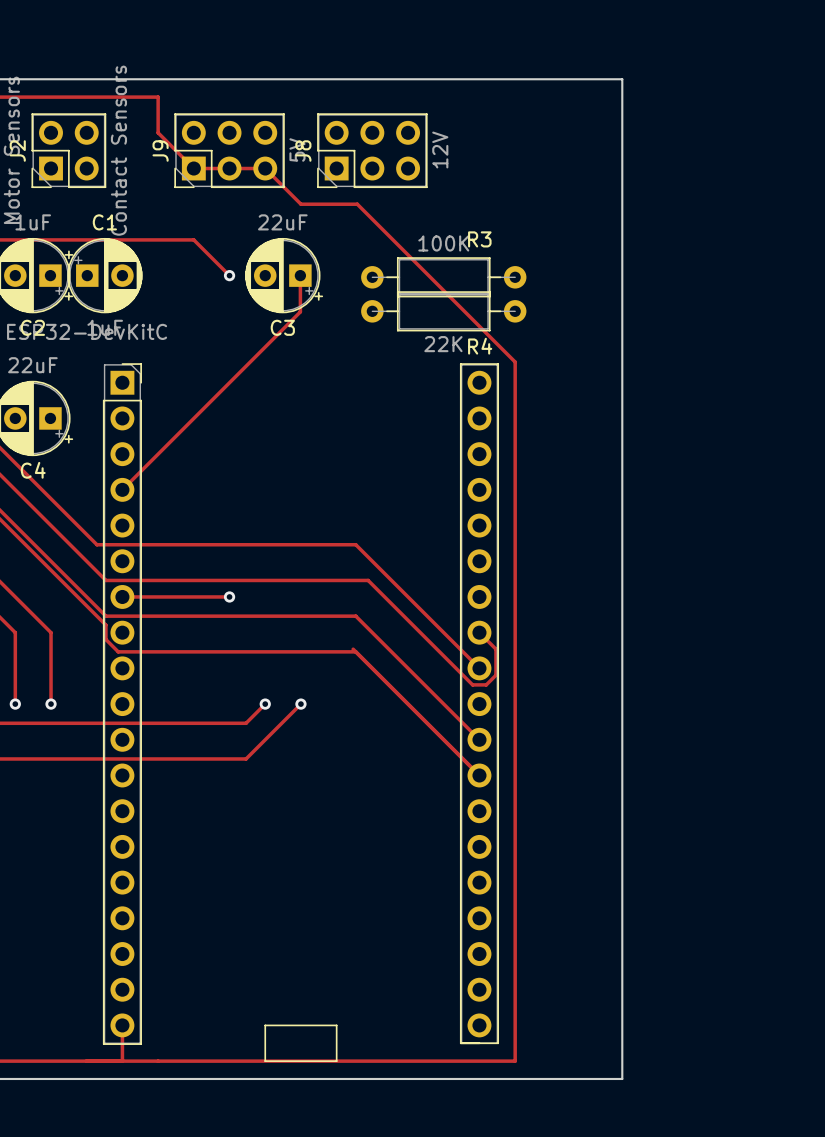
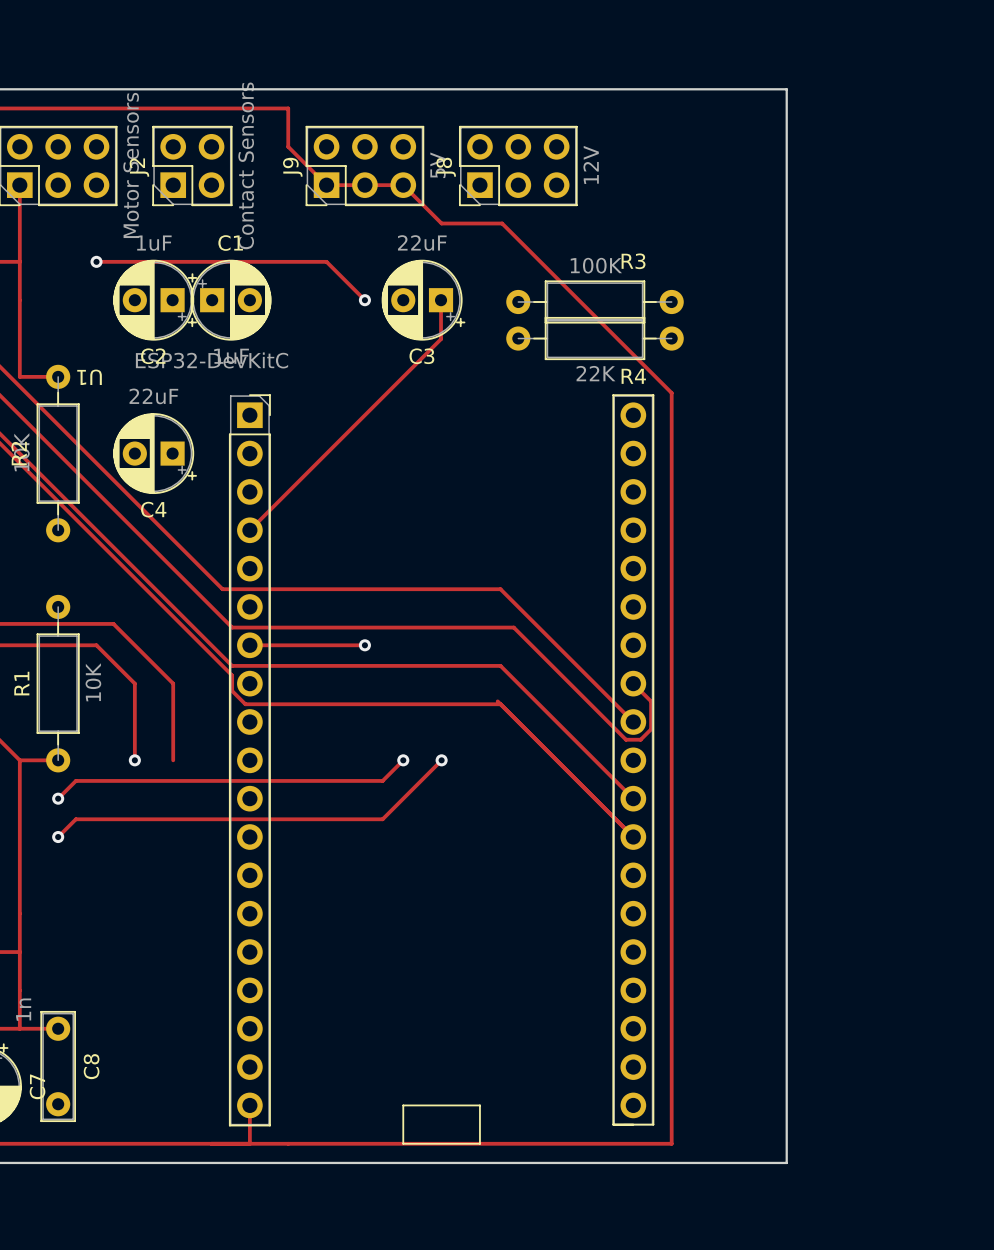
via: (51, 704) -> none

